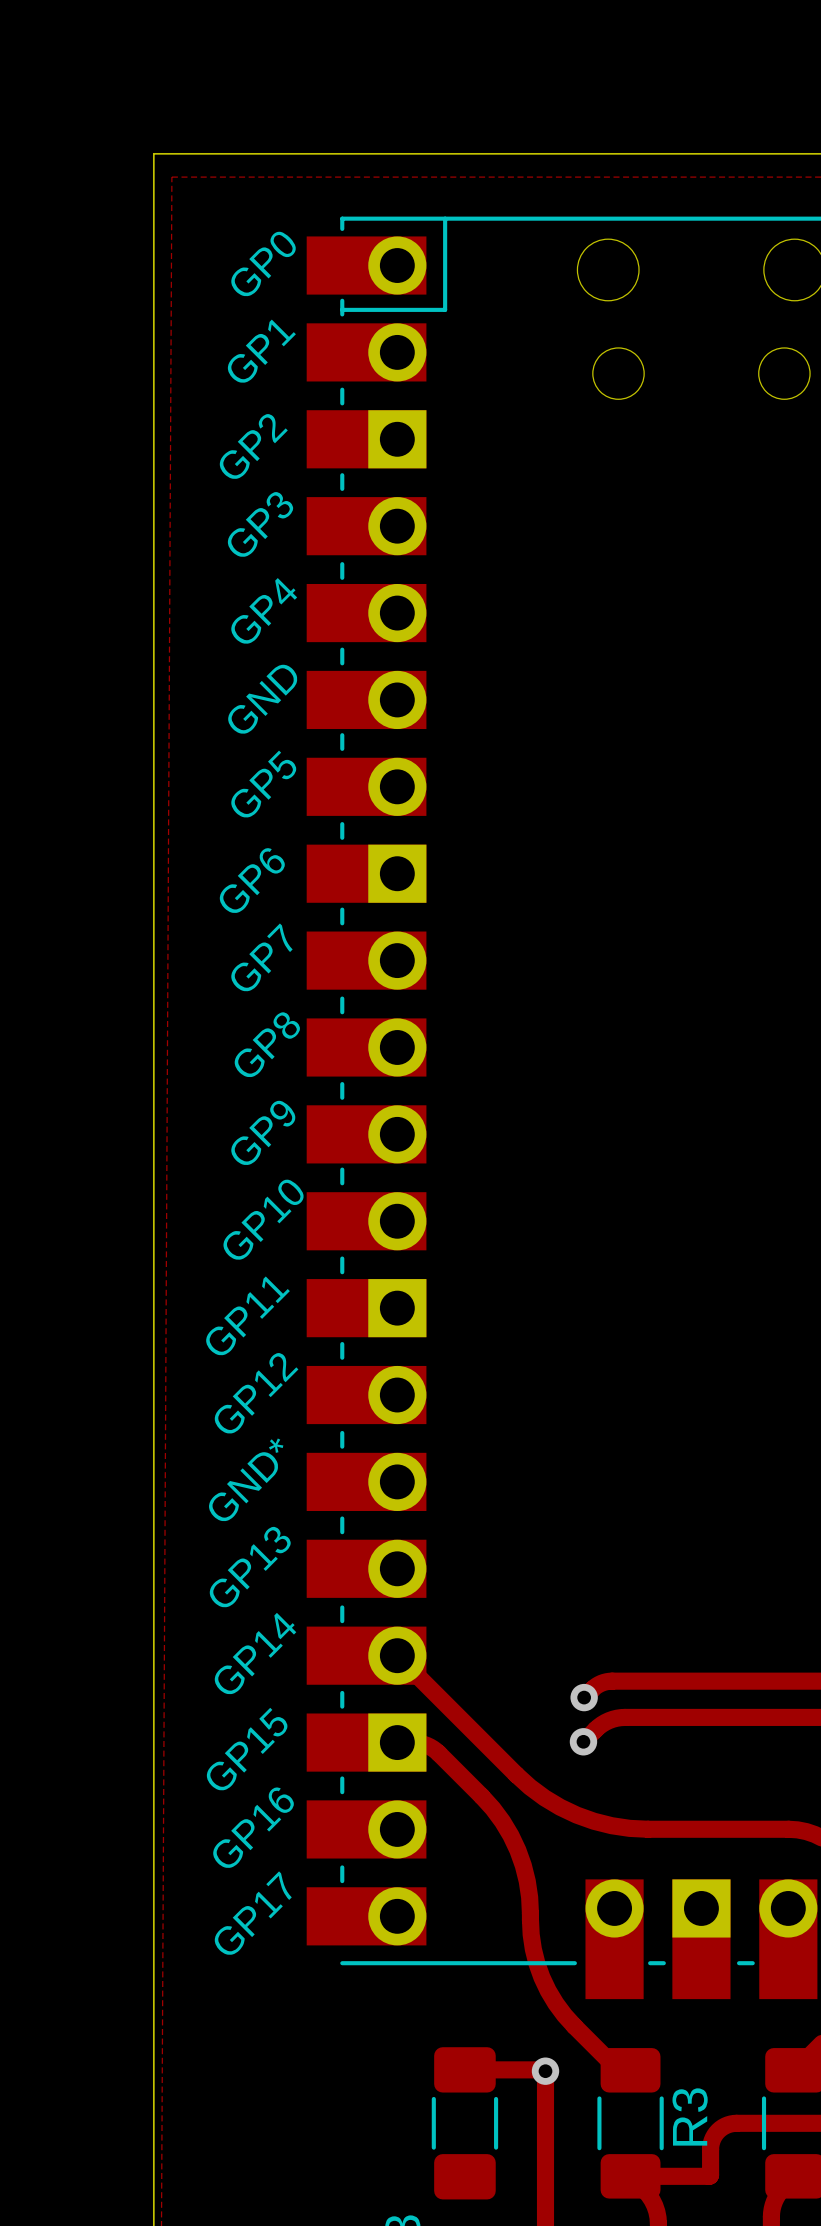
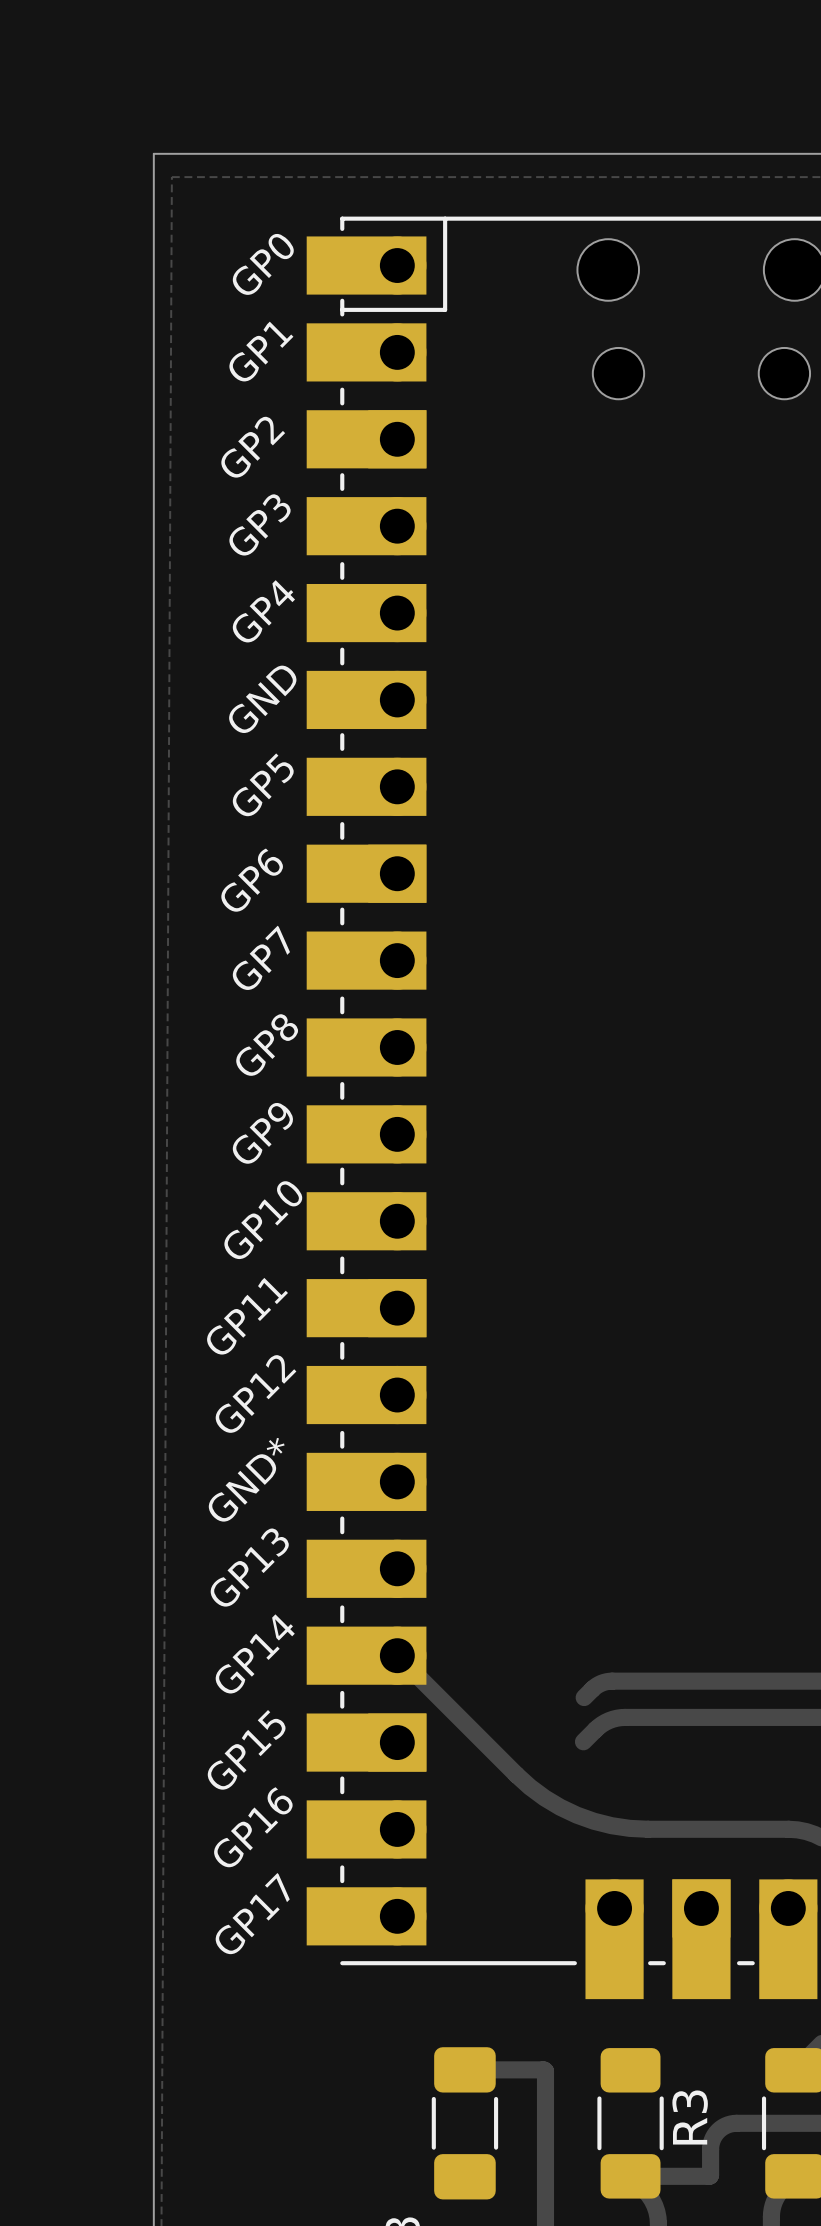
via: (584, 1697) -> none
via: (583, 1741) -> none
track: (397, 1742) (419, 1743) (436, 1750) (481, 1796) (502, 1821) (517, 1850) (523, 1865) (529, 1897) (533, 1949) (541, 1977) (564, 2015) (614, 2066) (624, 2070) (617, 2070) -> none
via: (545, 2071) -> none

